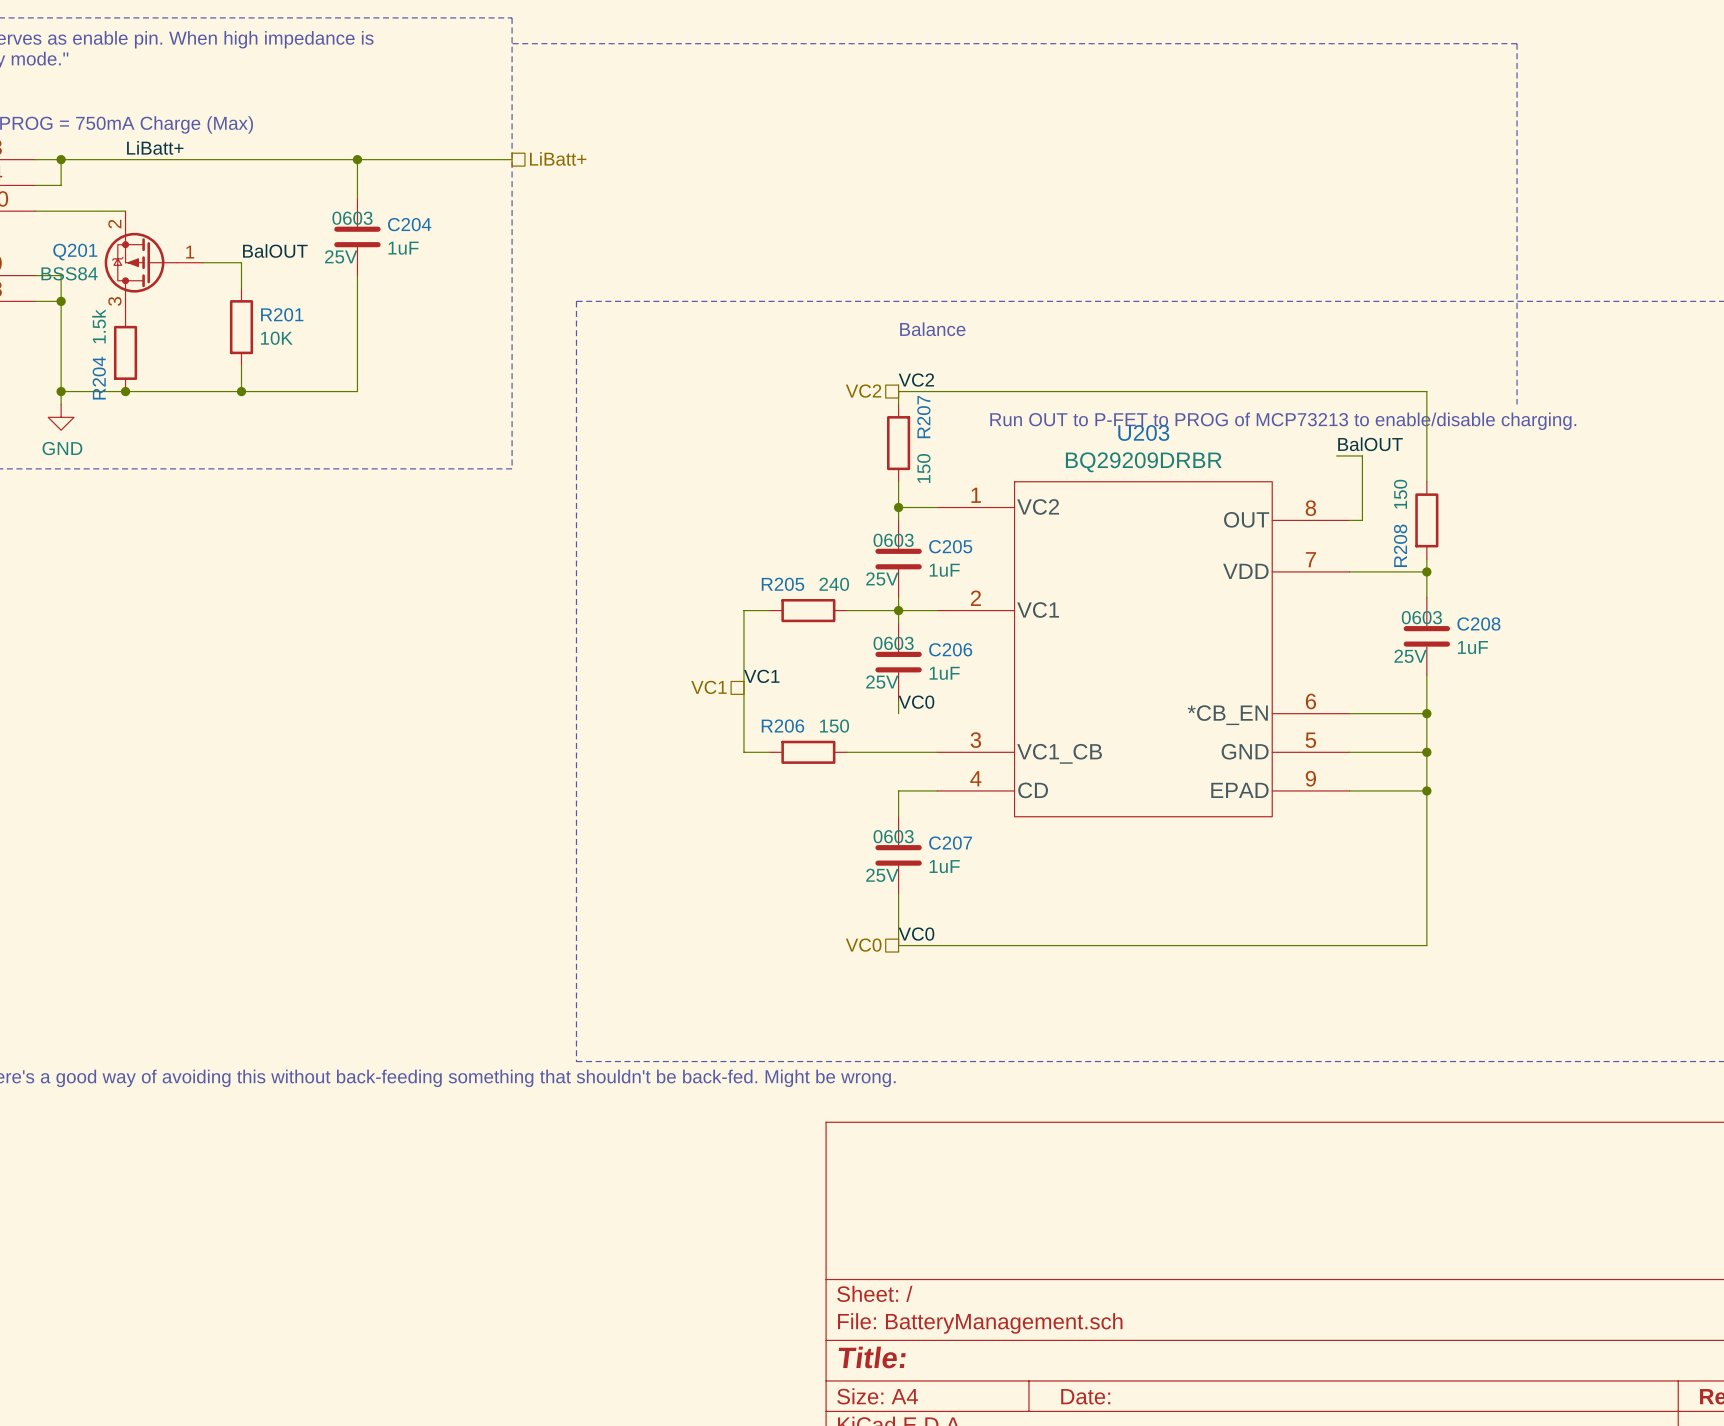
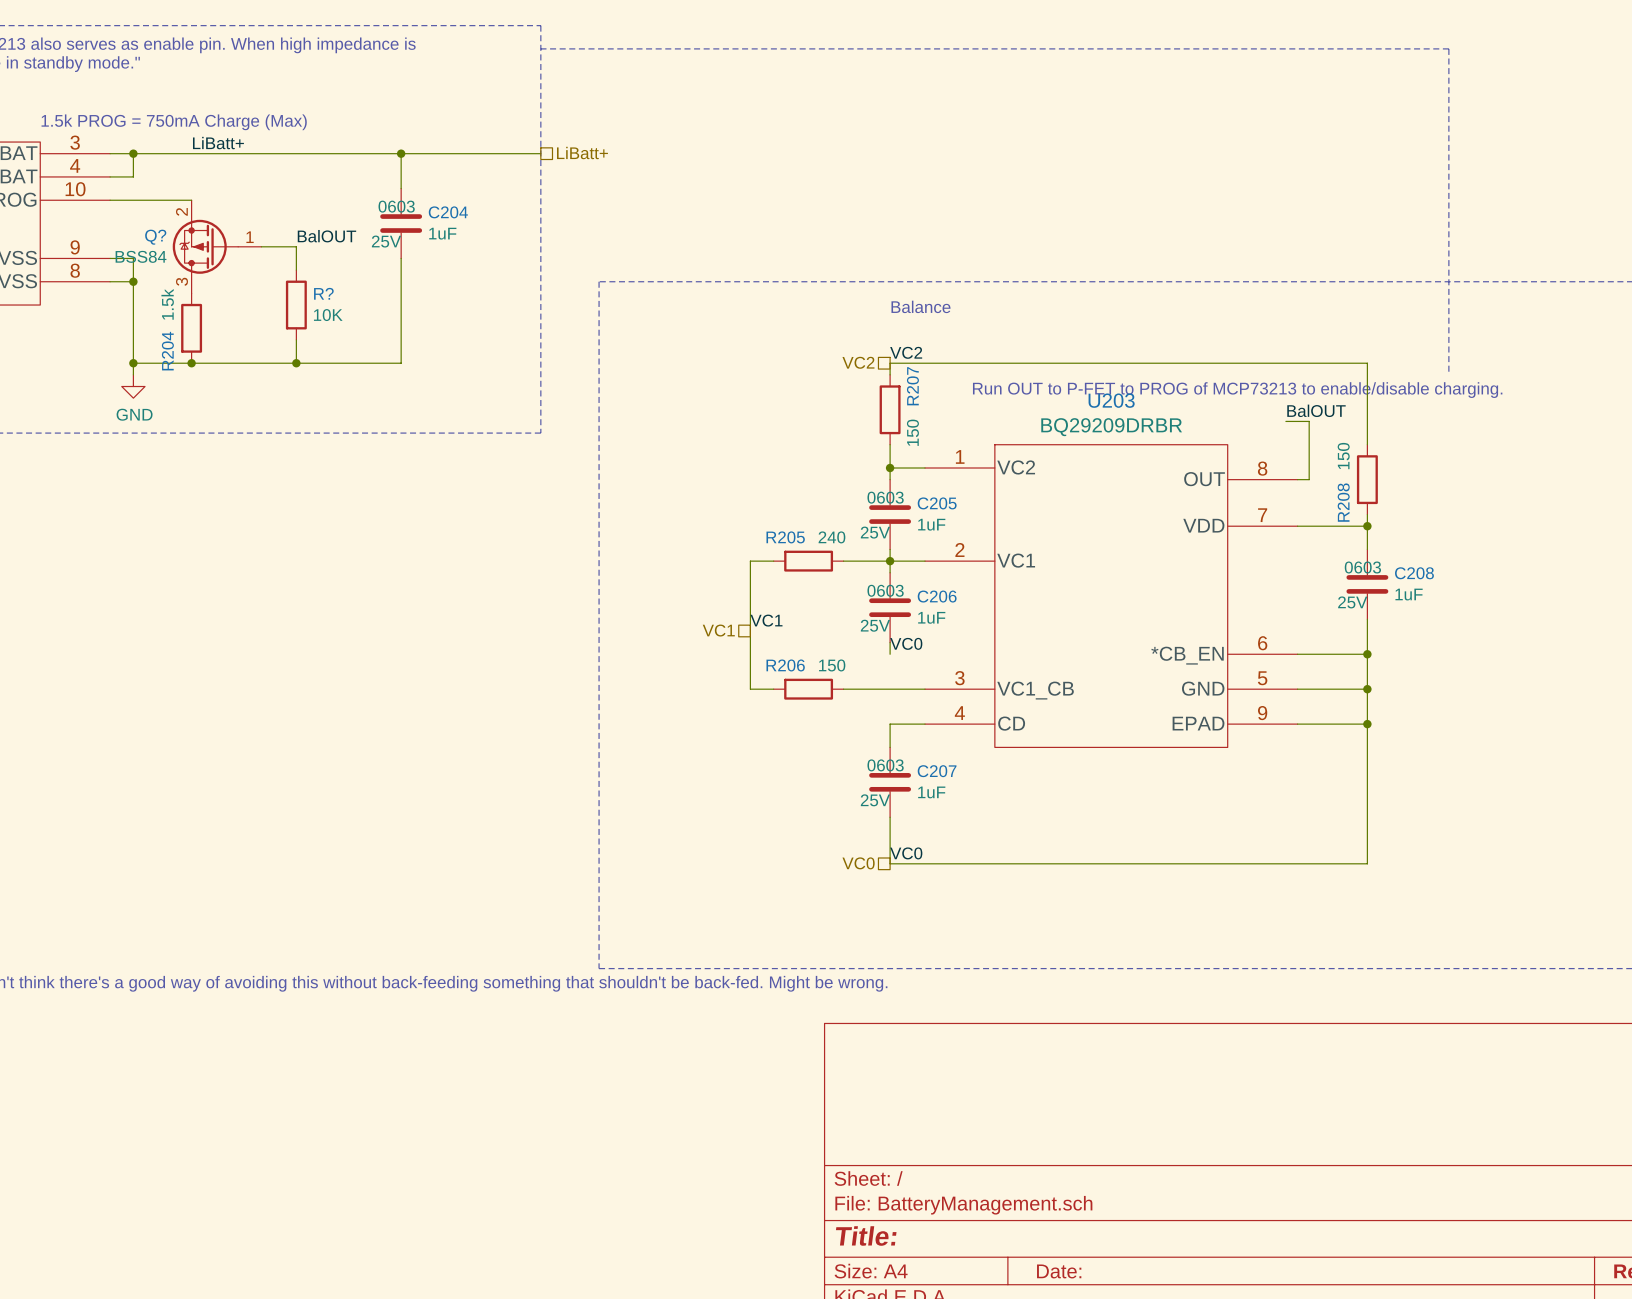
Q201 name: Q201 (75, 252) -> Q? (155, 237)
R201 name: R201 (282, 314) -> R? (323, 293)

